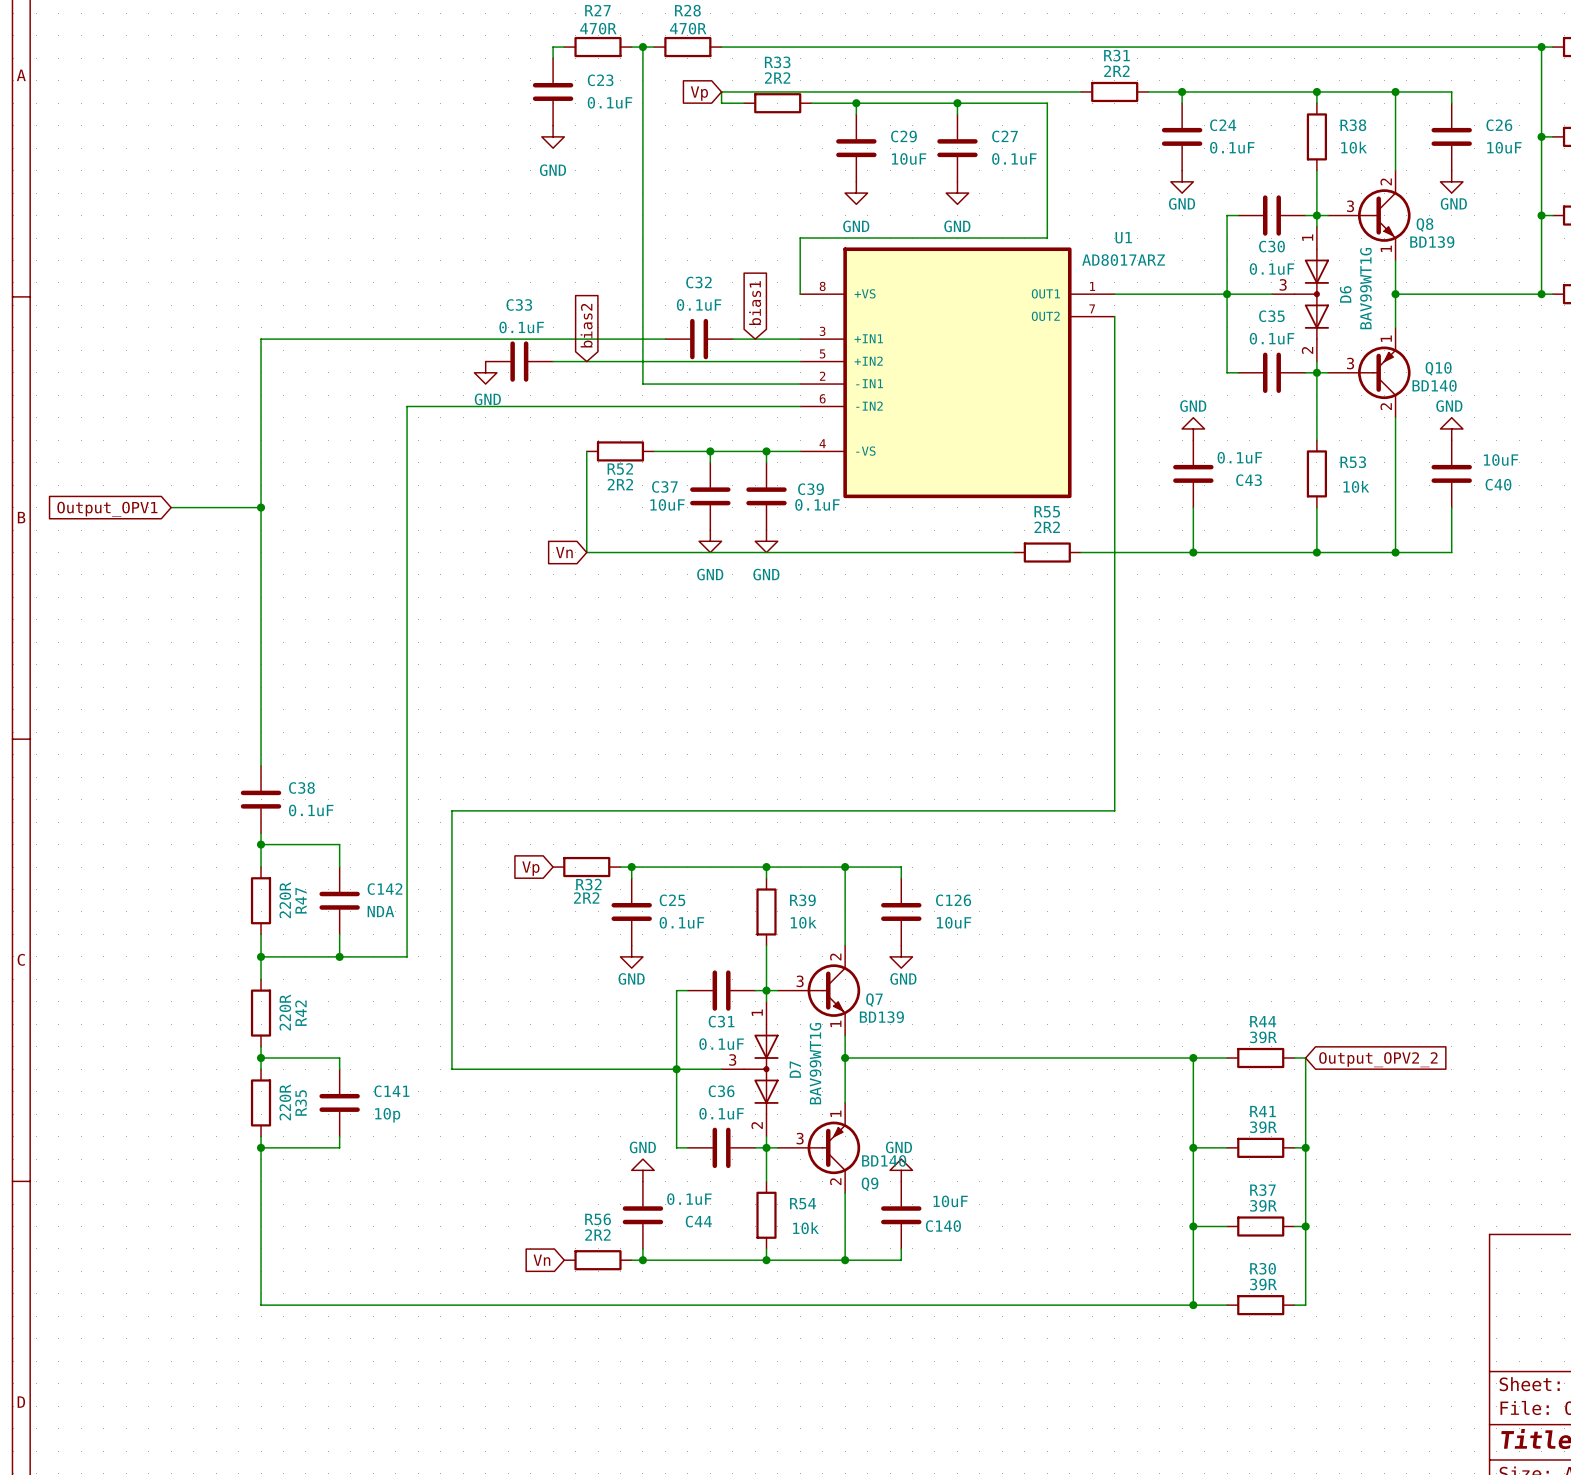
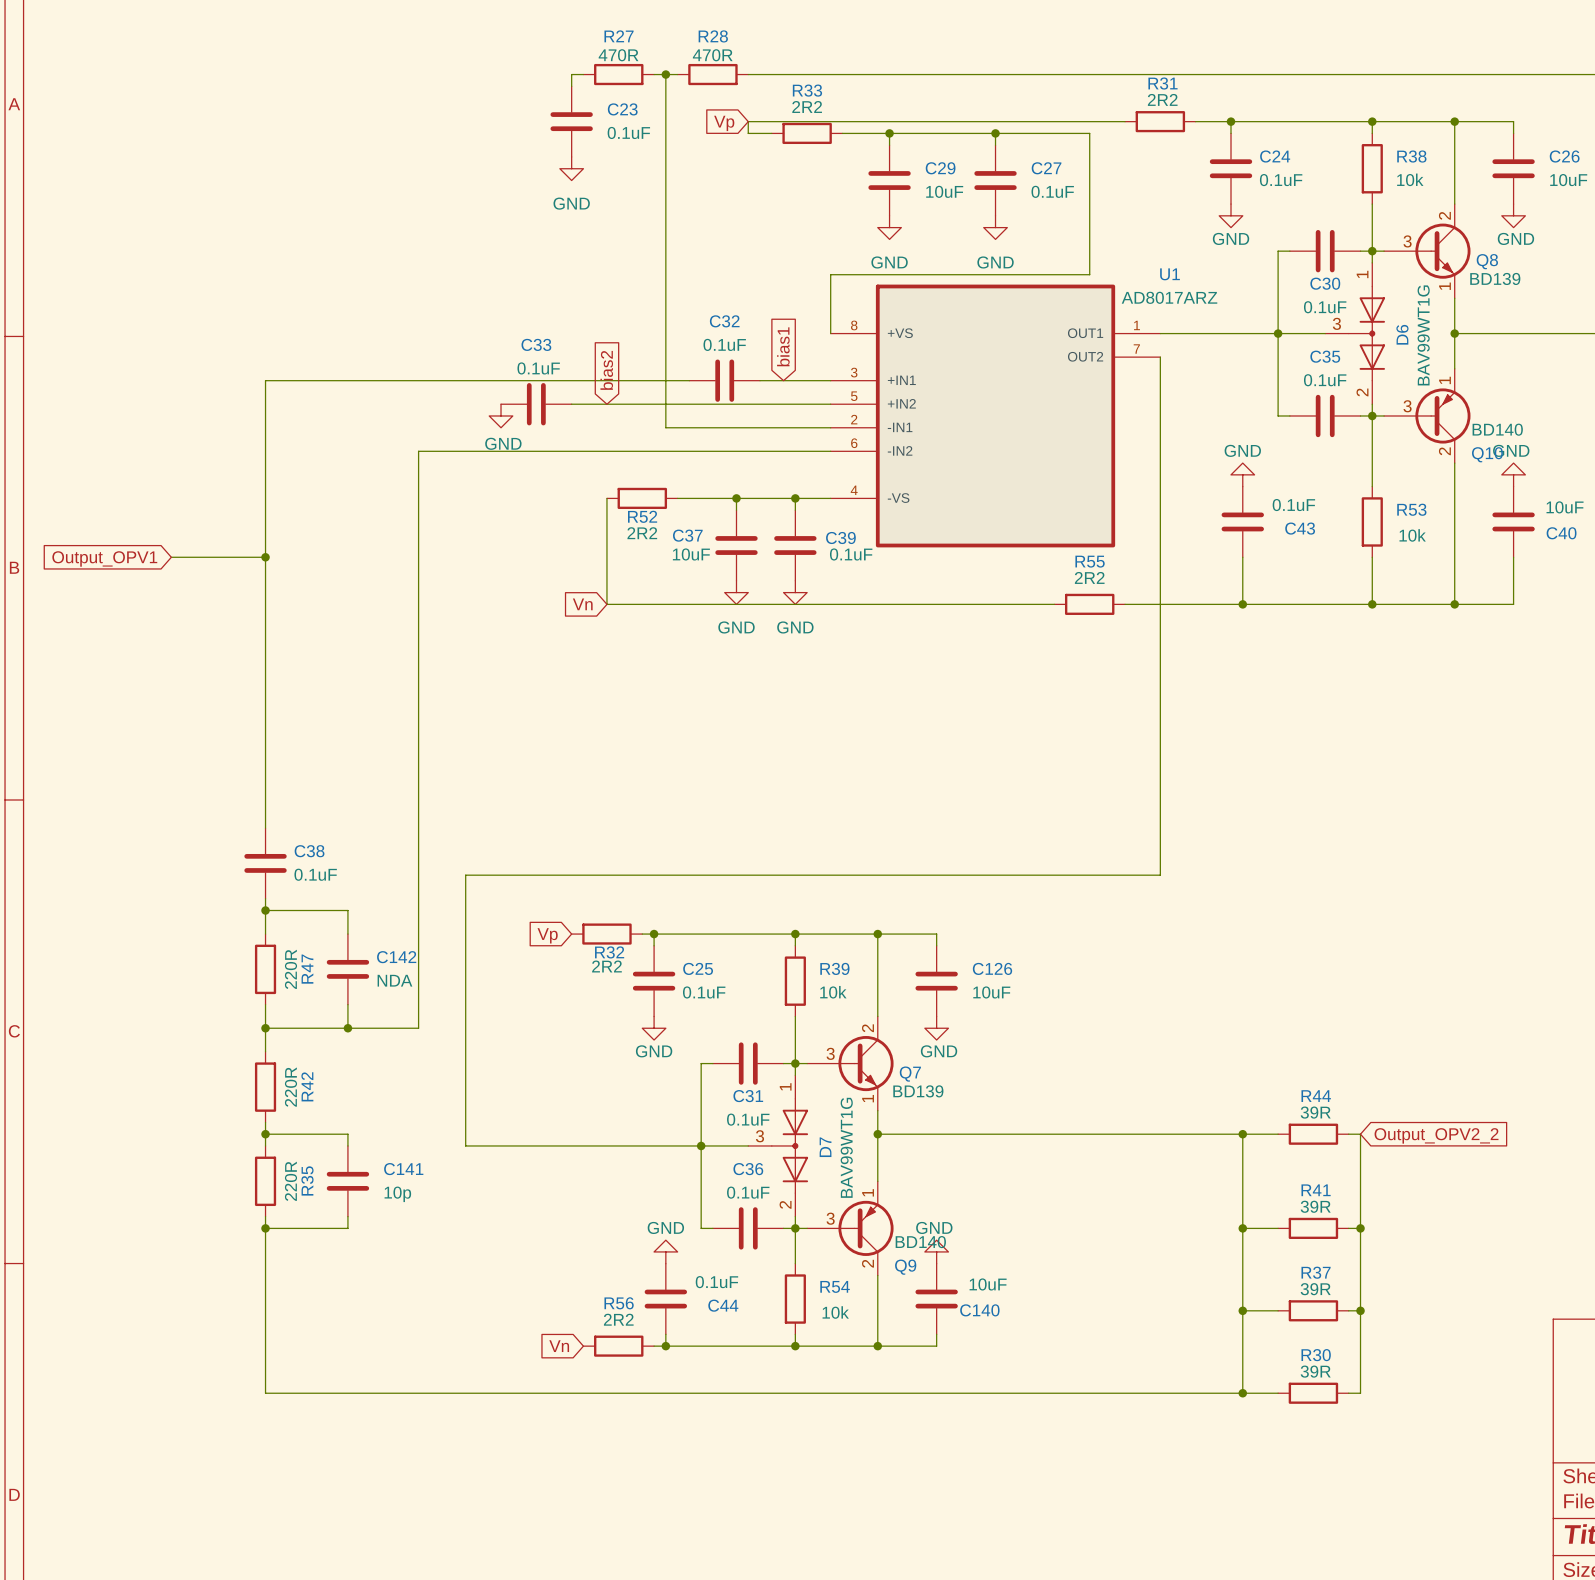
Q10 name position: Q10 (1438, 368) -> Q10 (1487, 454)

